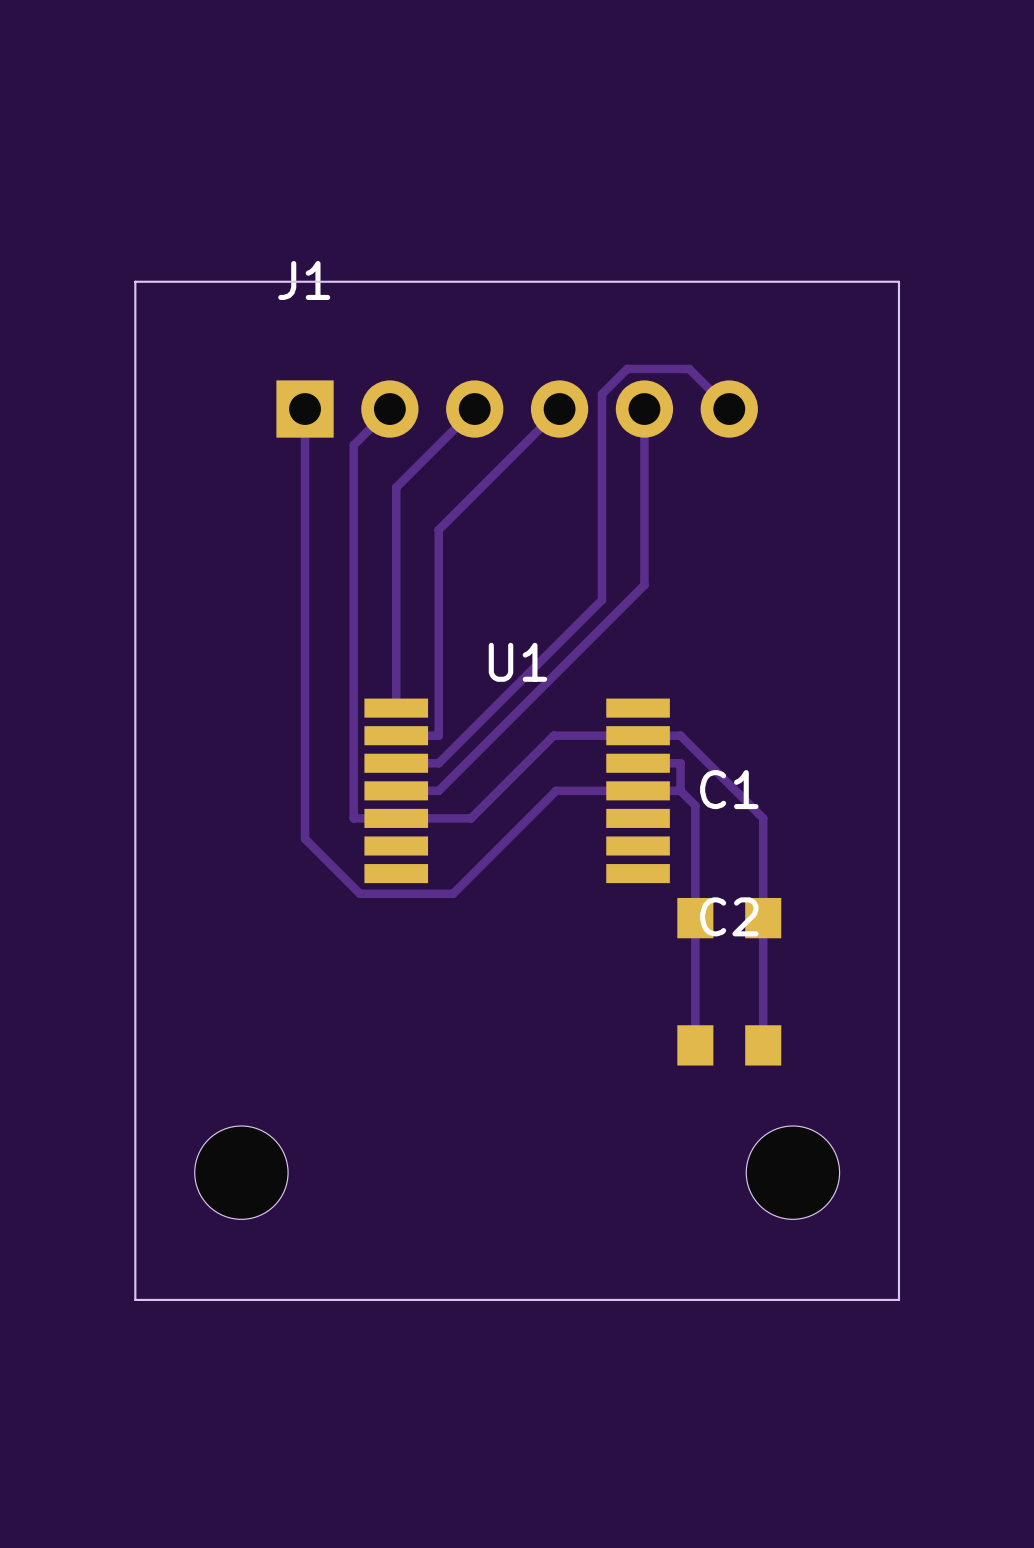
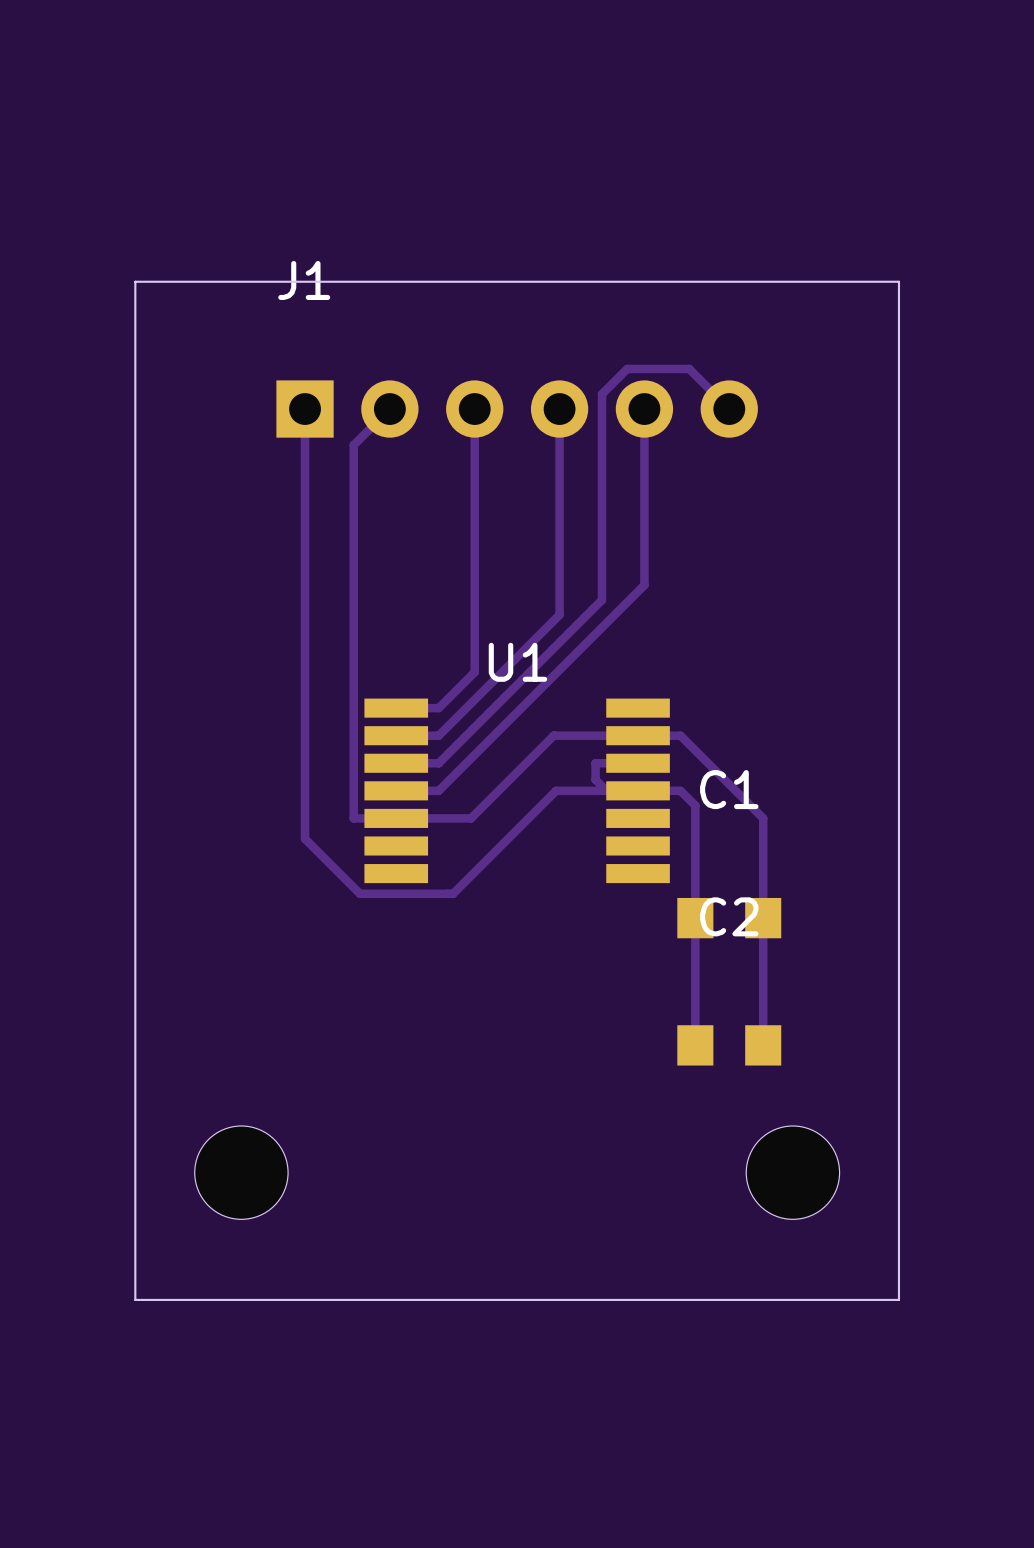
track: (474, 409) (396, 487) (396, 708) -> (474, 409) (474, 672) (438, 708) (396, 708)
track: (559, 409) (438, 529) (438, 735) -> (559, 409) (559, 614) (438, 735)
track: (638, 763) (680, 763) (680, 790) -> (638, 763) (595, 763) (595, 779) (606, 790)

